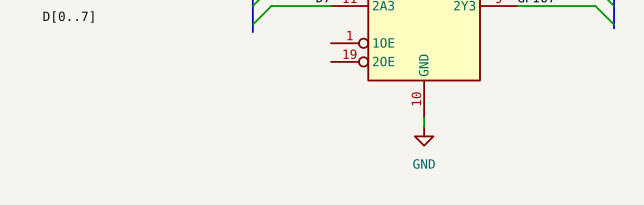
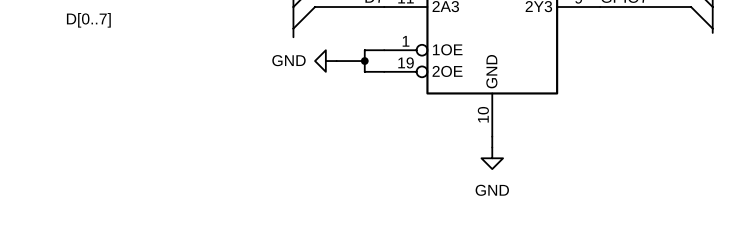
wire: none -> (384, 50) (364, 50) (364, 71) (384, 71)
power symbol: none -> GND (325, 61)
wire: none -> (336, 61) (364, 61)
junction: none -> (364, 61)

